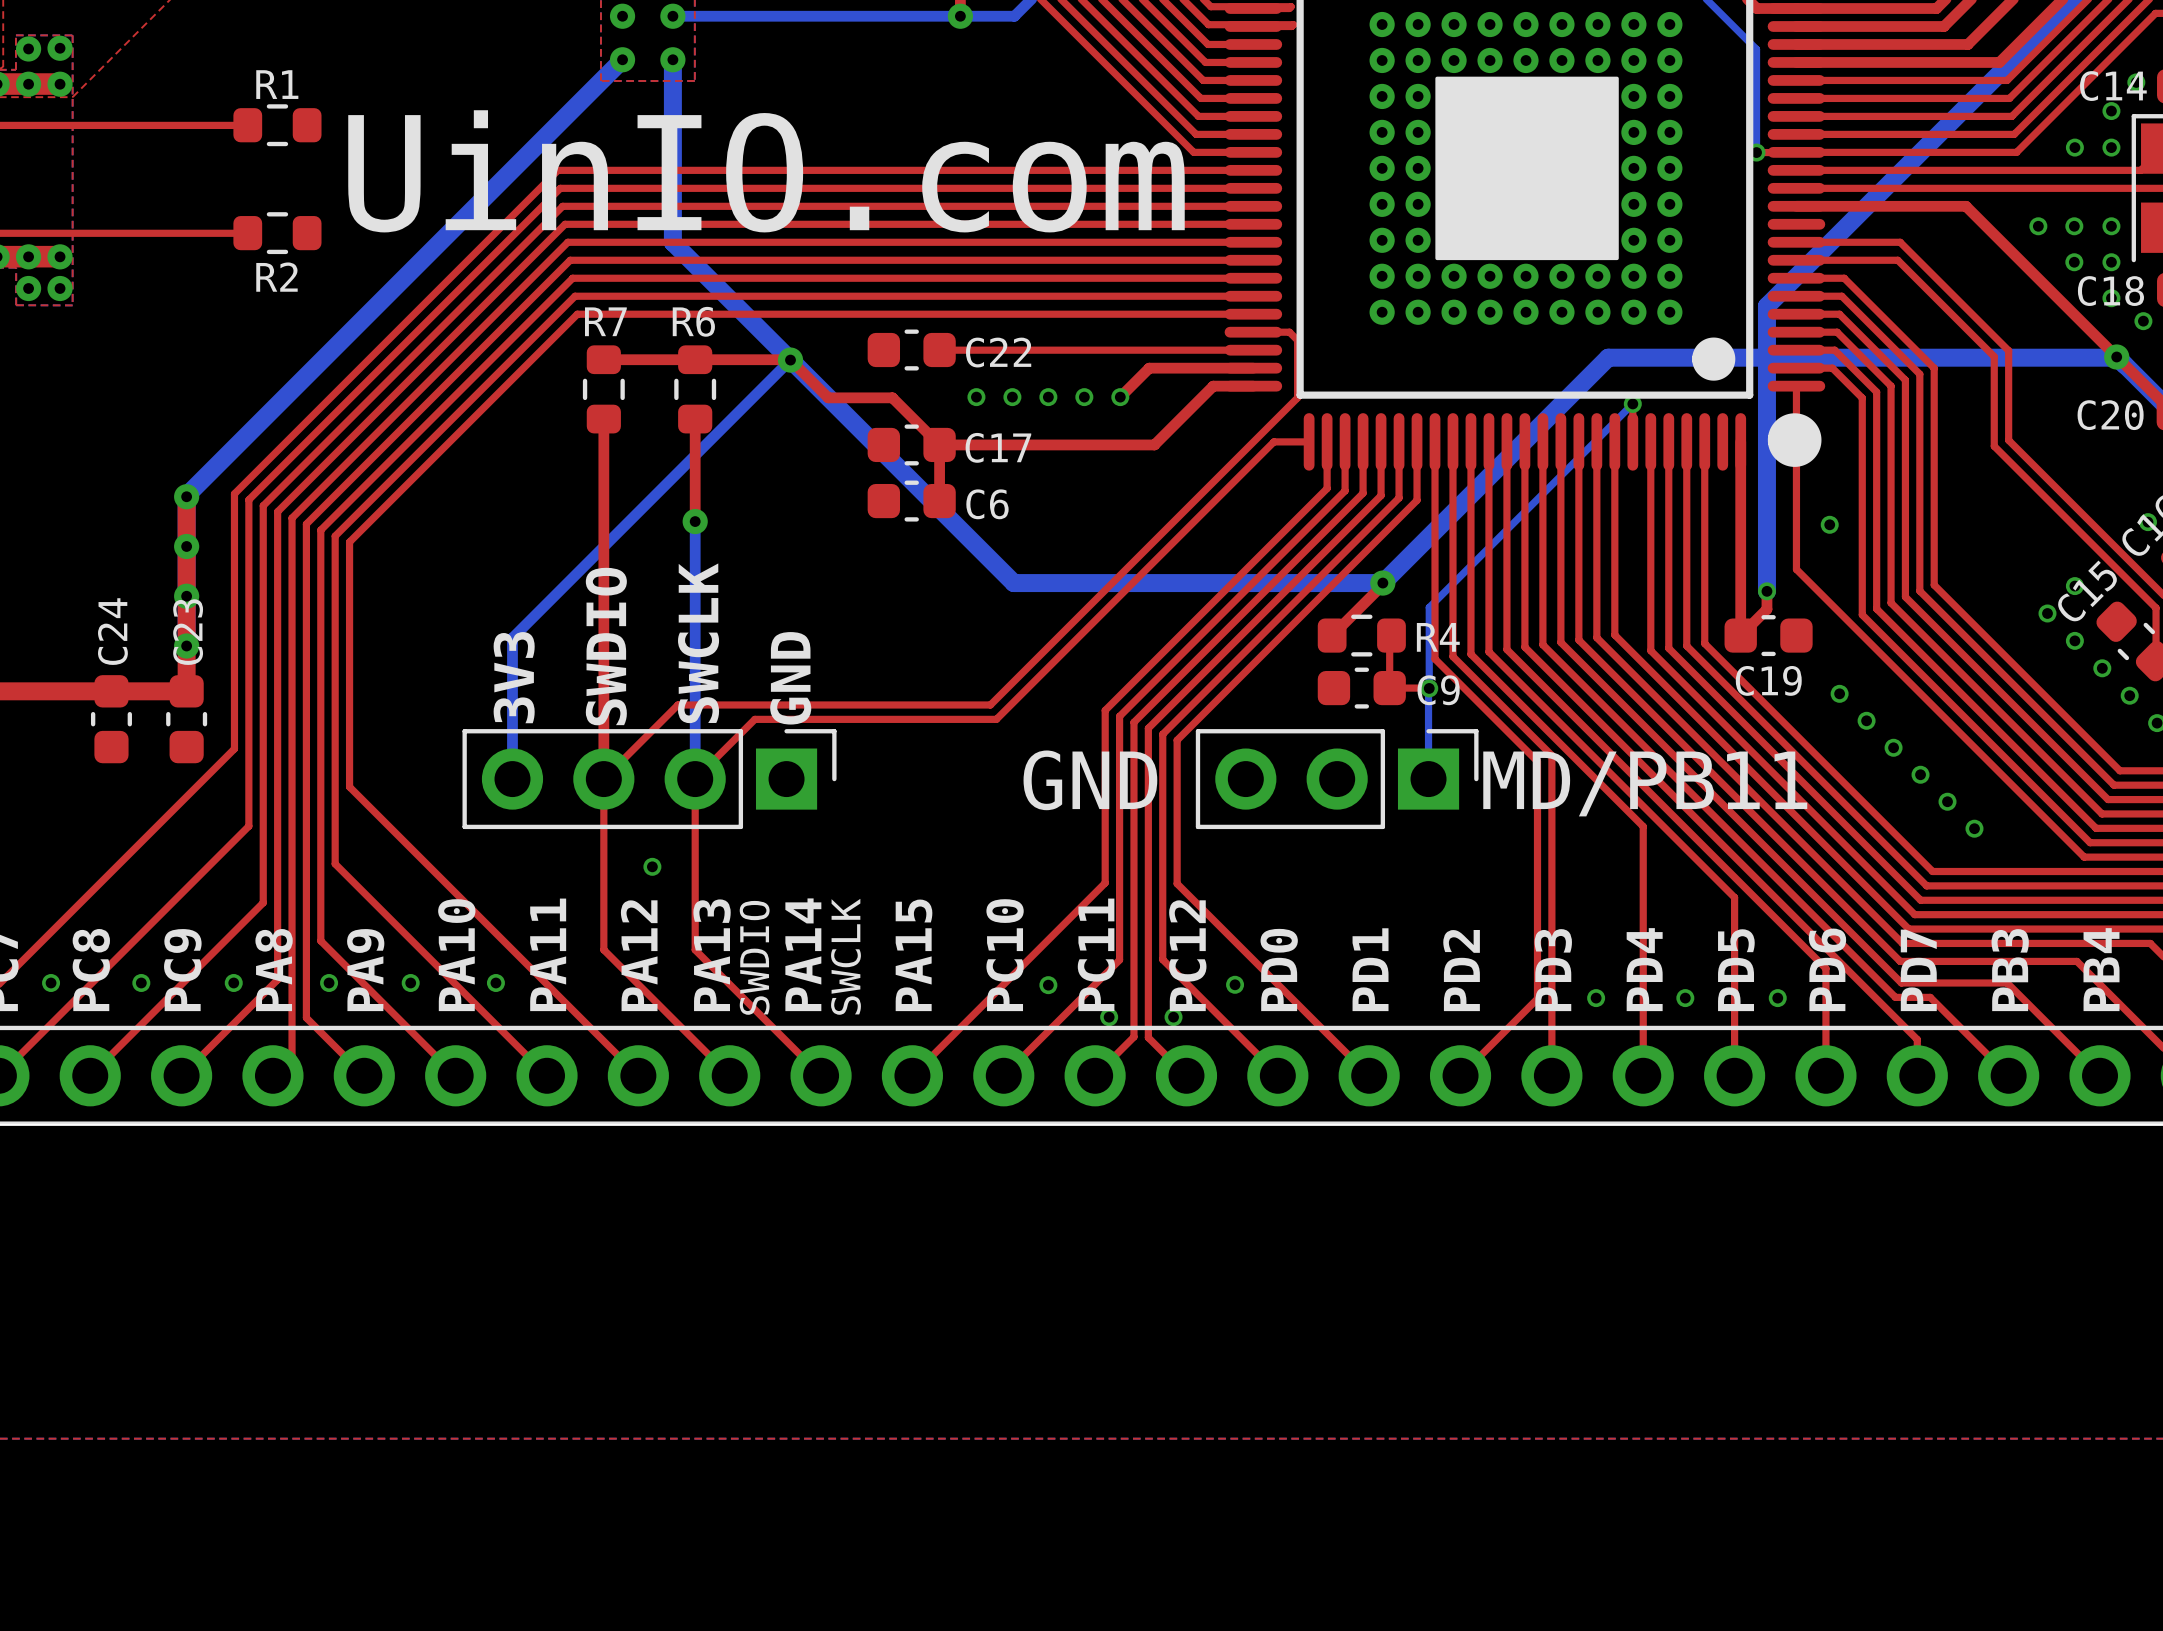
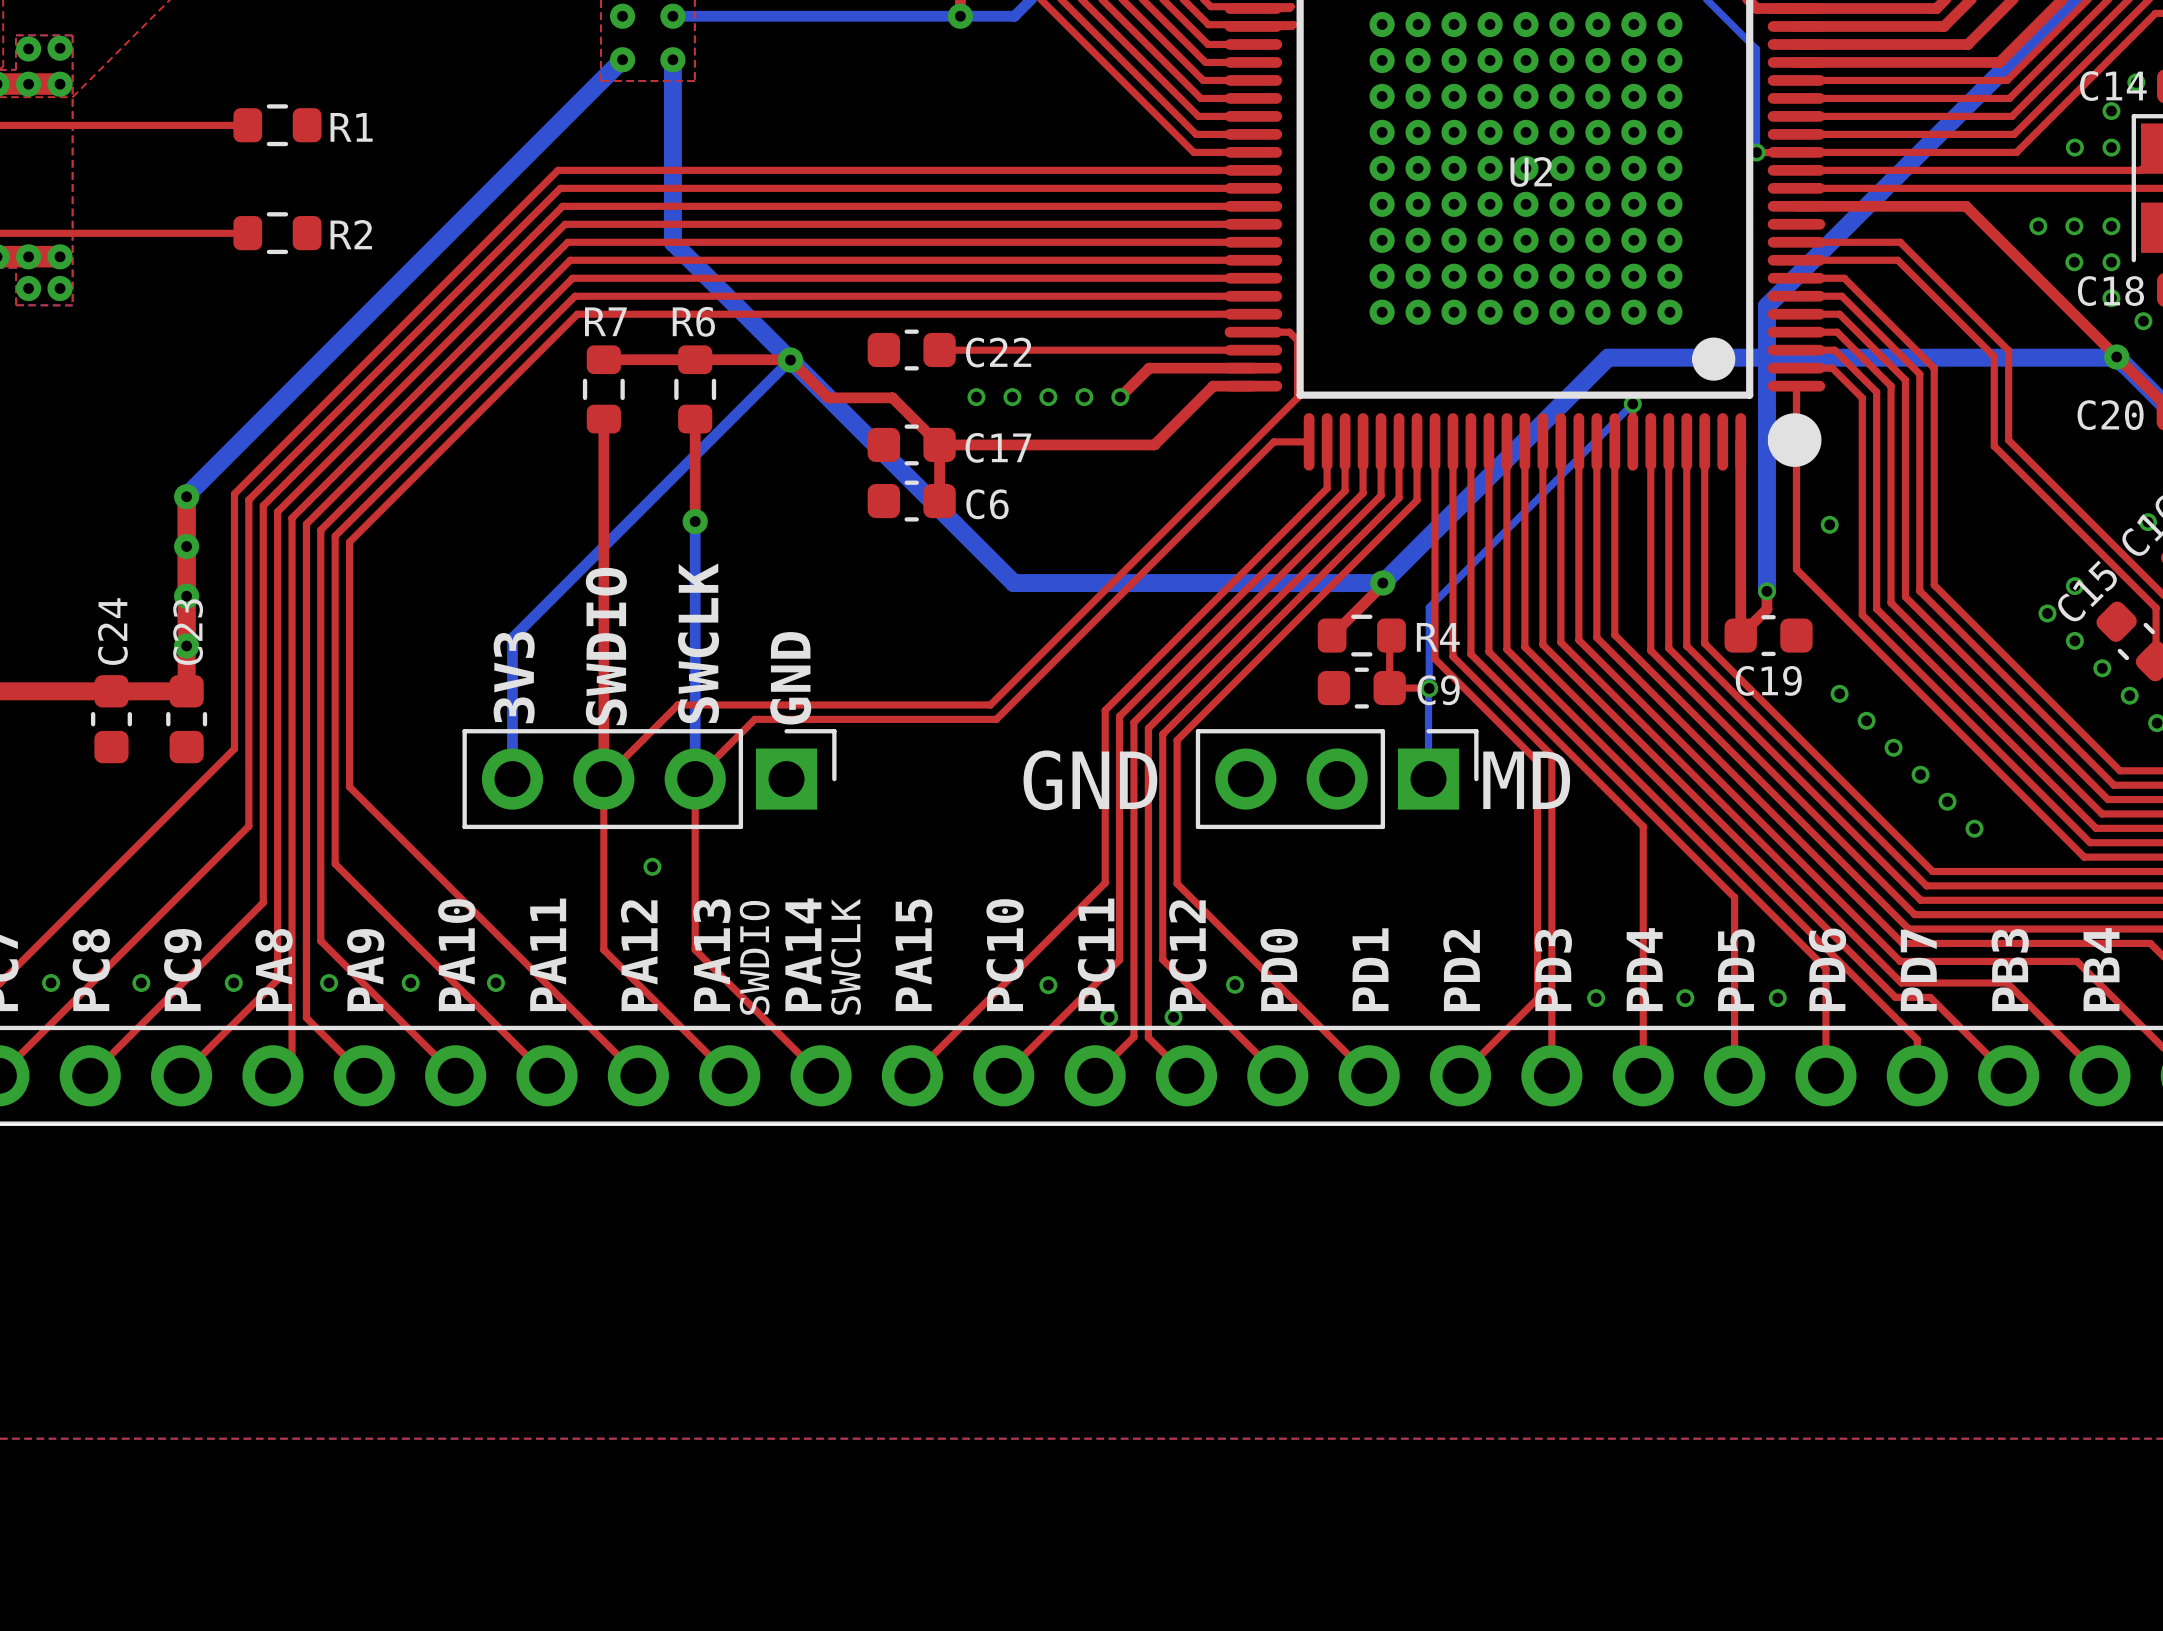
drawing: [1435, 76, 1619, 261] -> none
R1 name position: R1 (277, 84) -> R1 (351, 127)
text: UinIO.com (766, 171) -> none
U2 name: none -> U2 (1531, 172)
R2 name position: R2 (276, 277) -> R2 (351, 234)
text: MD/PB11 (1645, 783) -> MD (1526, 780)

